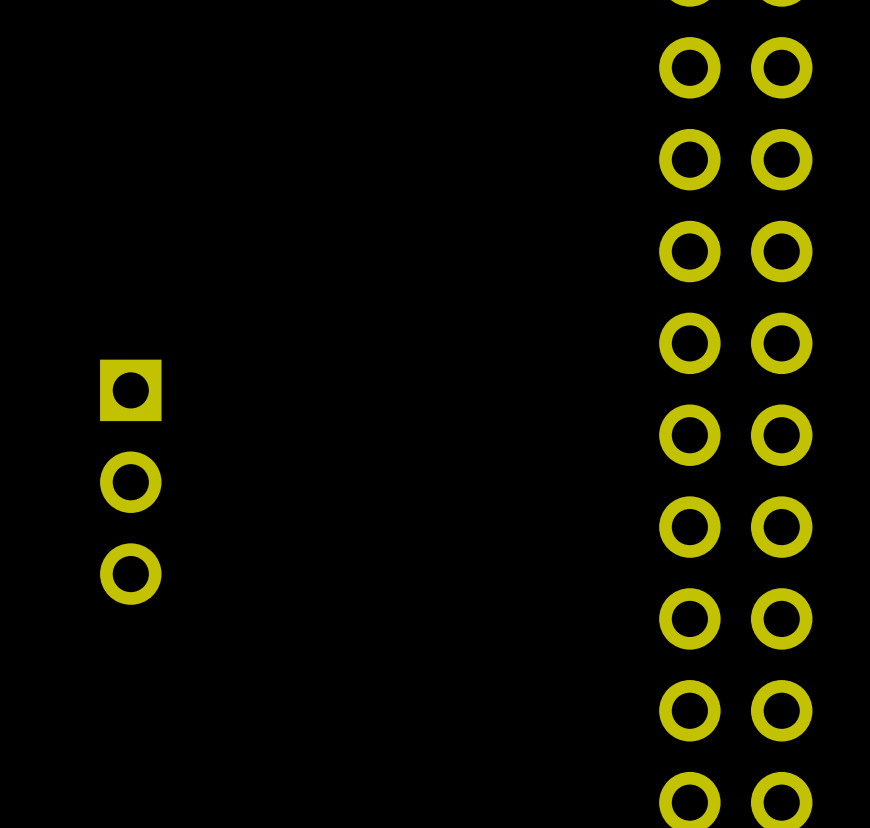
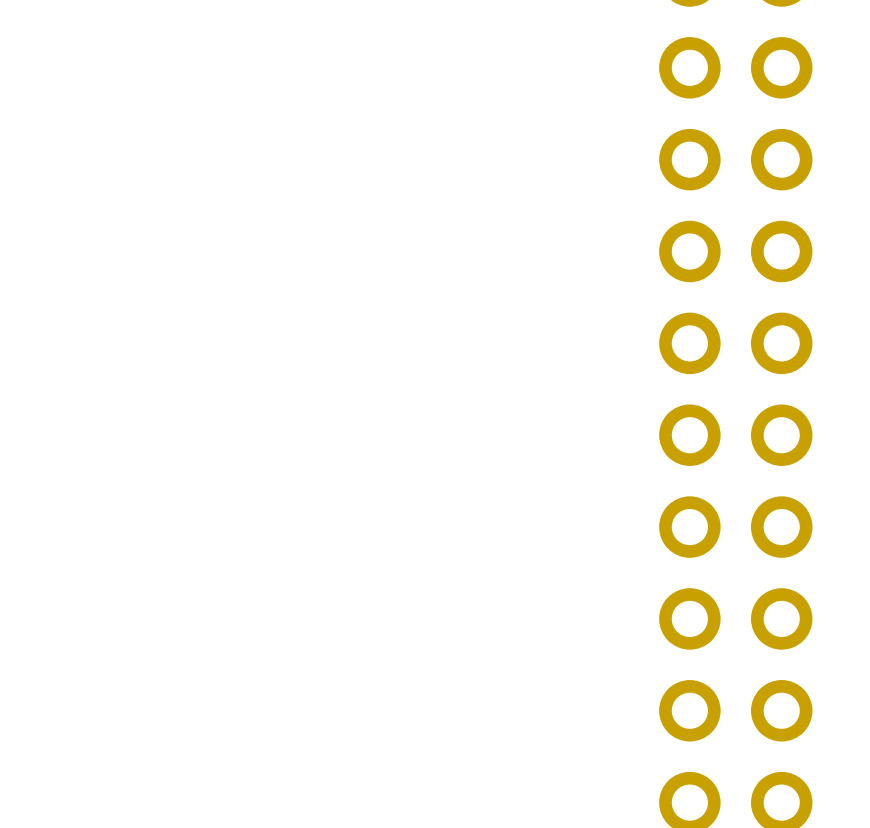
part: (130, 482) -> none

